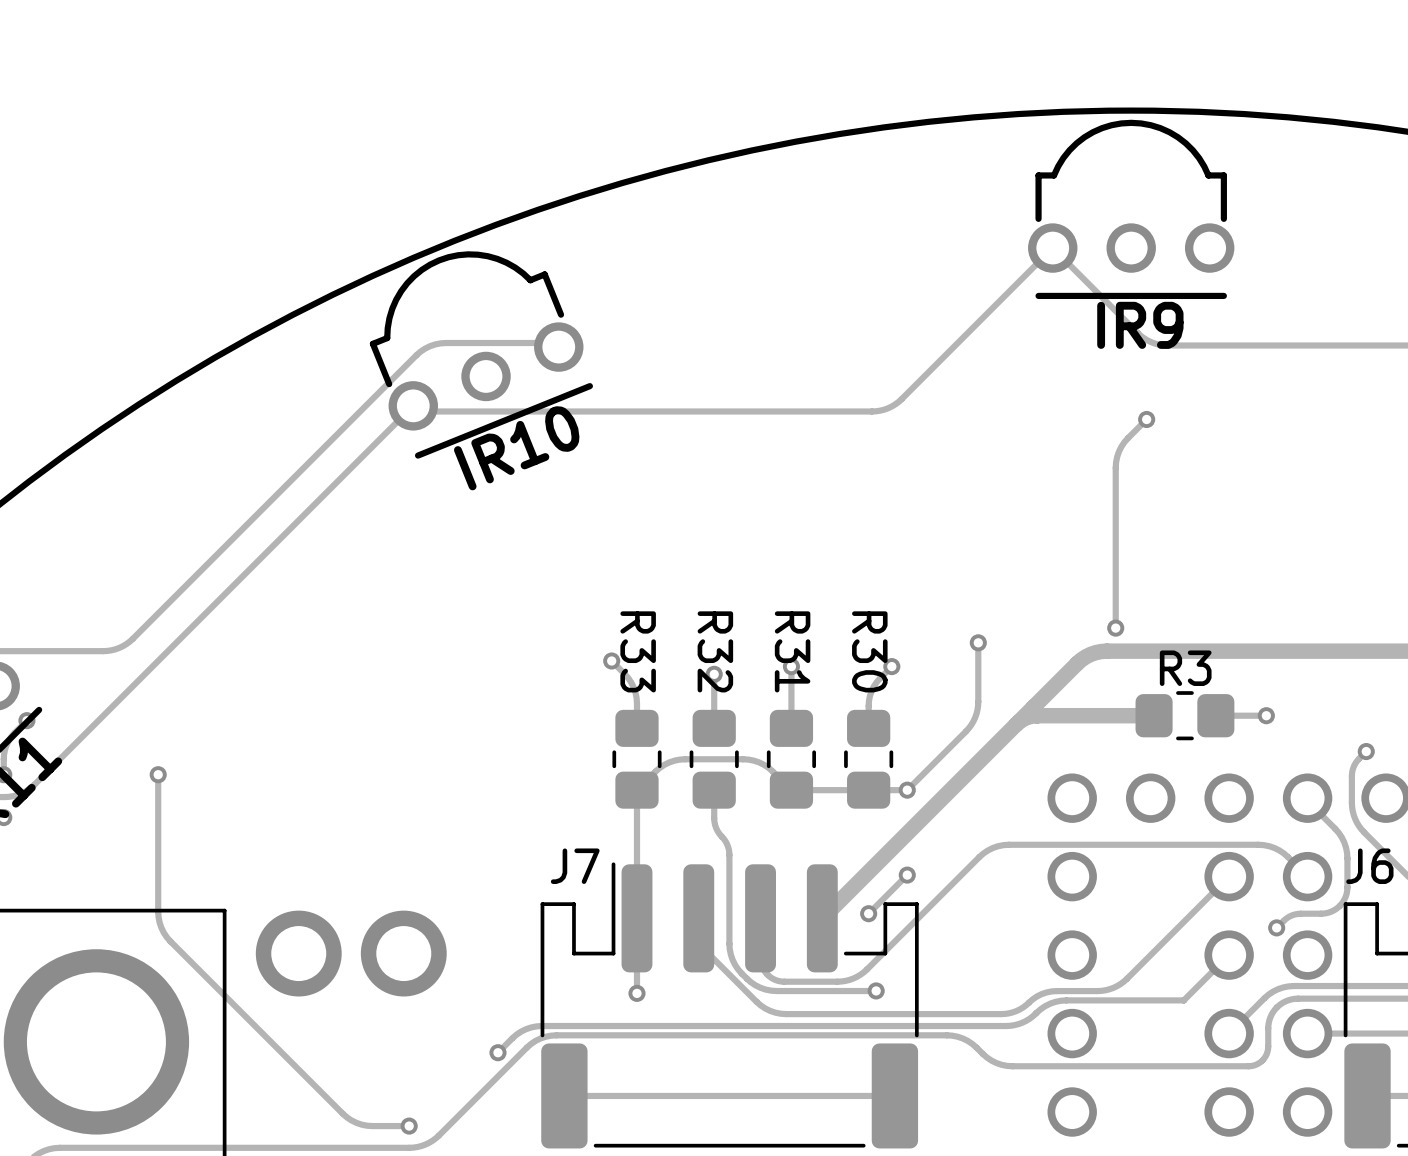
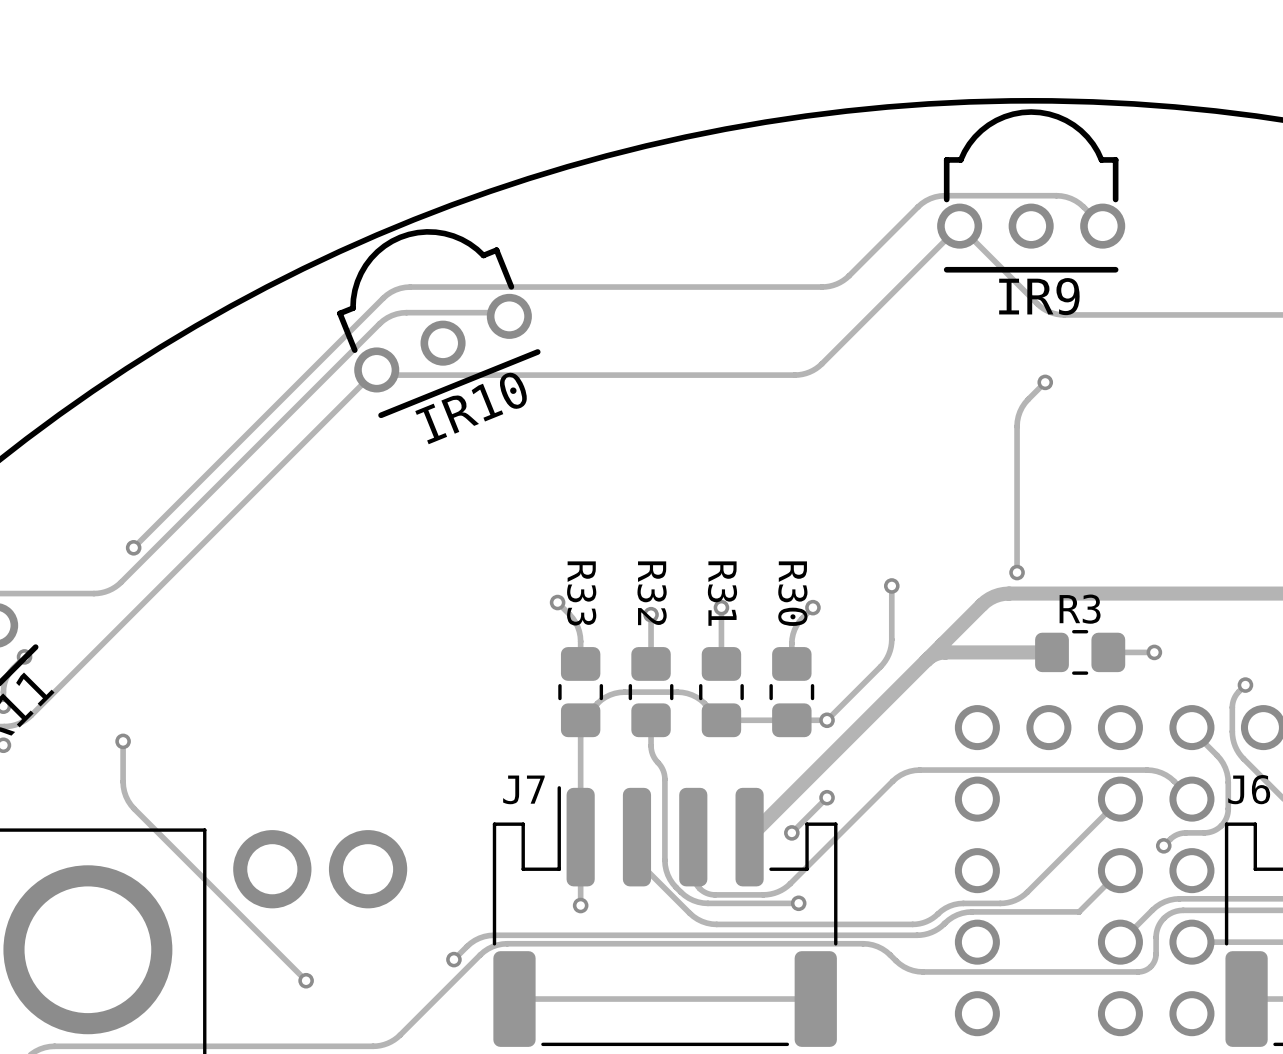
track: none -> (1102, 226) (1079, 203) (1061, 196) (940, 196) (921, 203) (846, 278) (829, 286) (400, 288) (383, 298) (133, 547)
via: none -> (133, 547)
track: (158, 774) (158, 911) (159, 922) (166, 937) (346, 1117) (367, 1125) (409, 1126) -> none
via position: (158, 774) -> (123, 741)
track: none -> (123, 741) (123, 786) (131, 805) (306, 980)
via position: (409, 1126) -> (306, 980)

